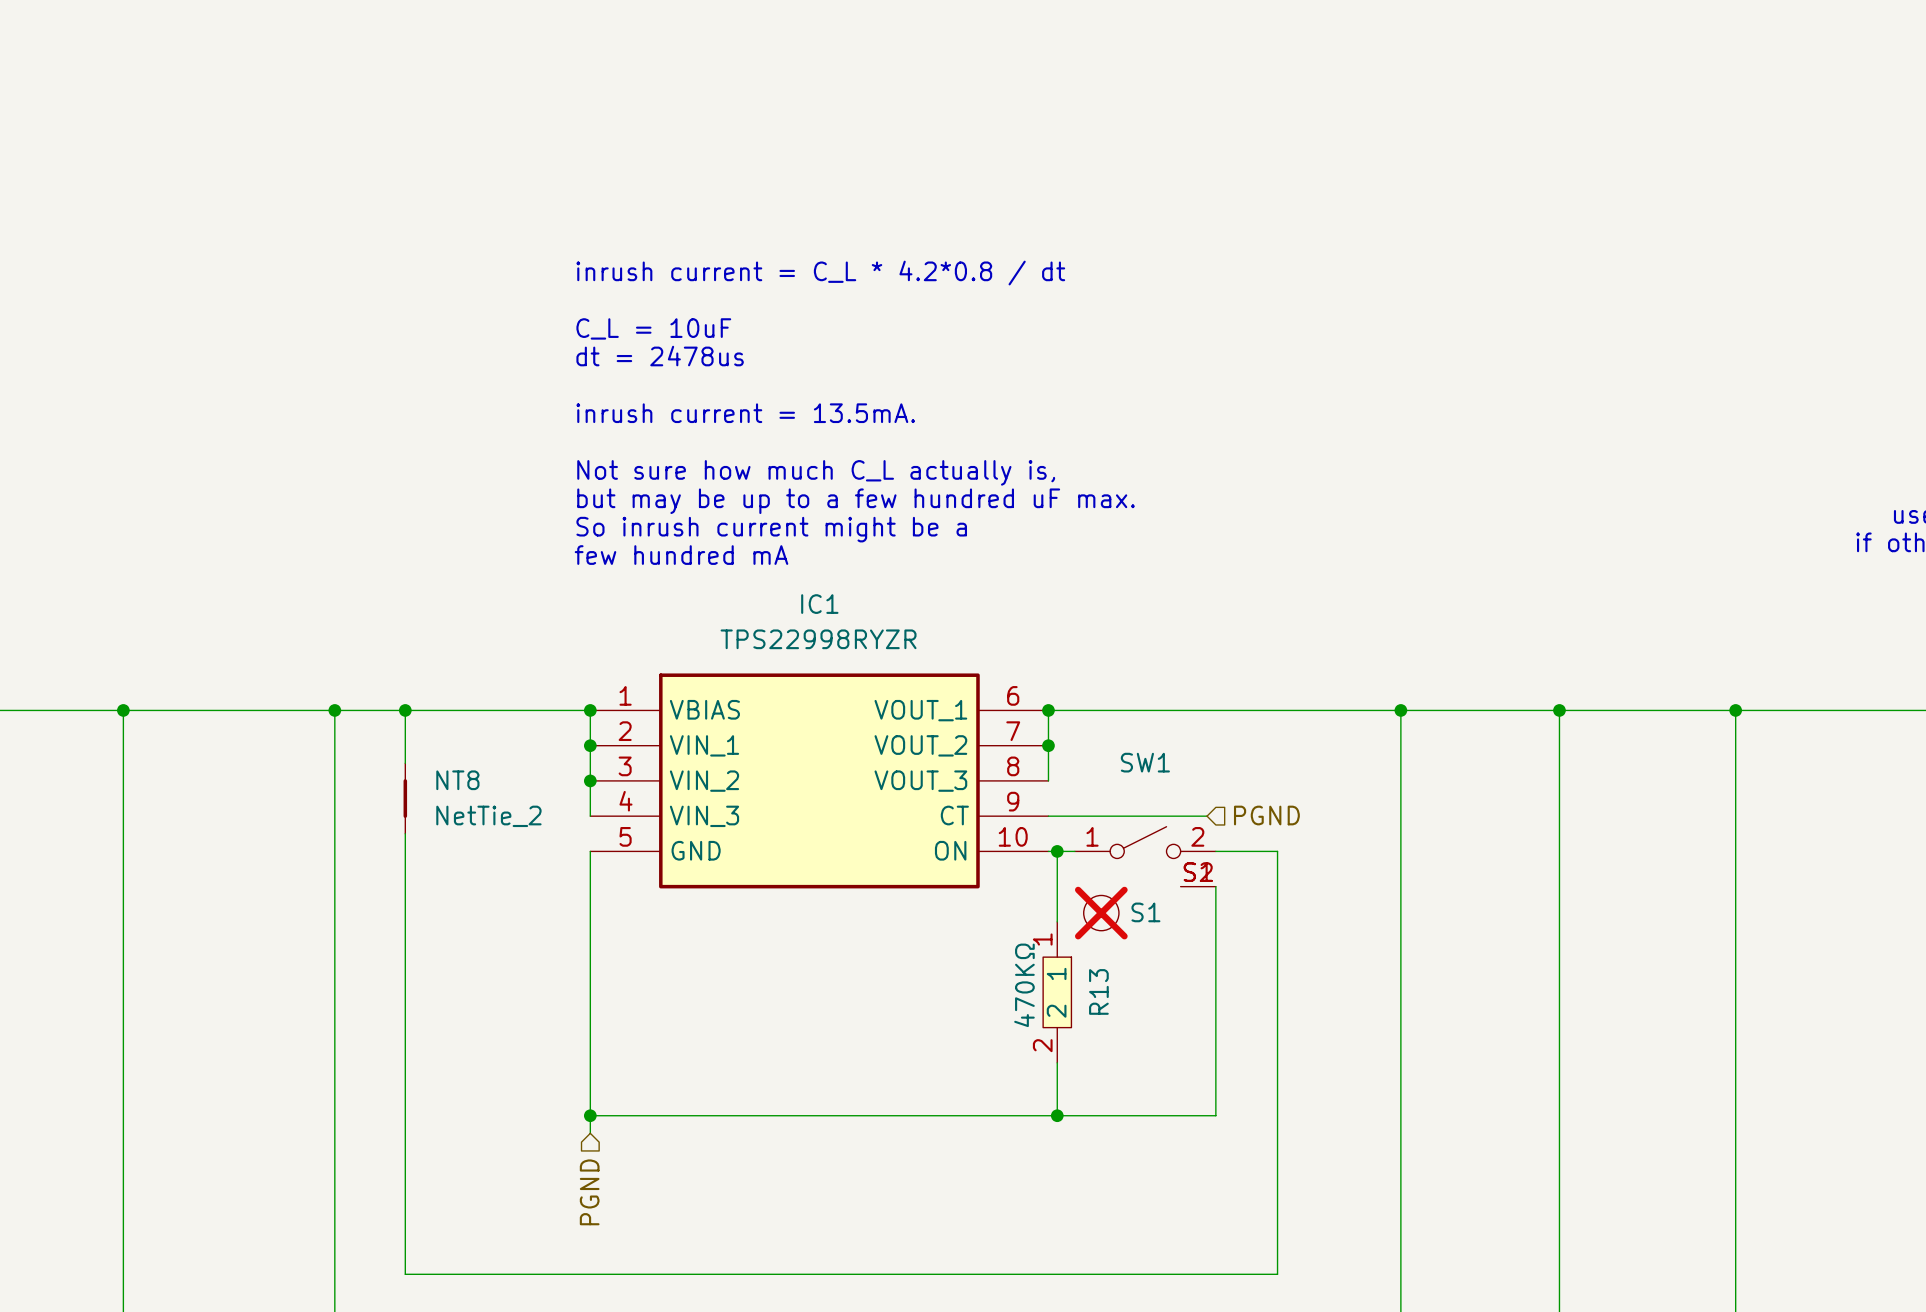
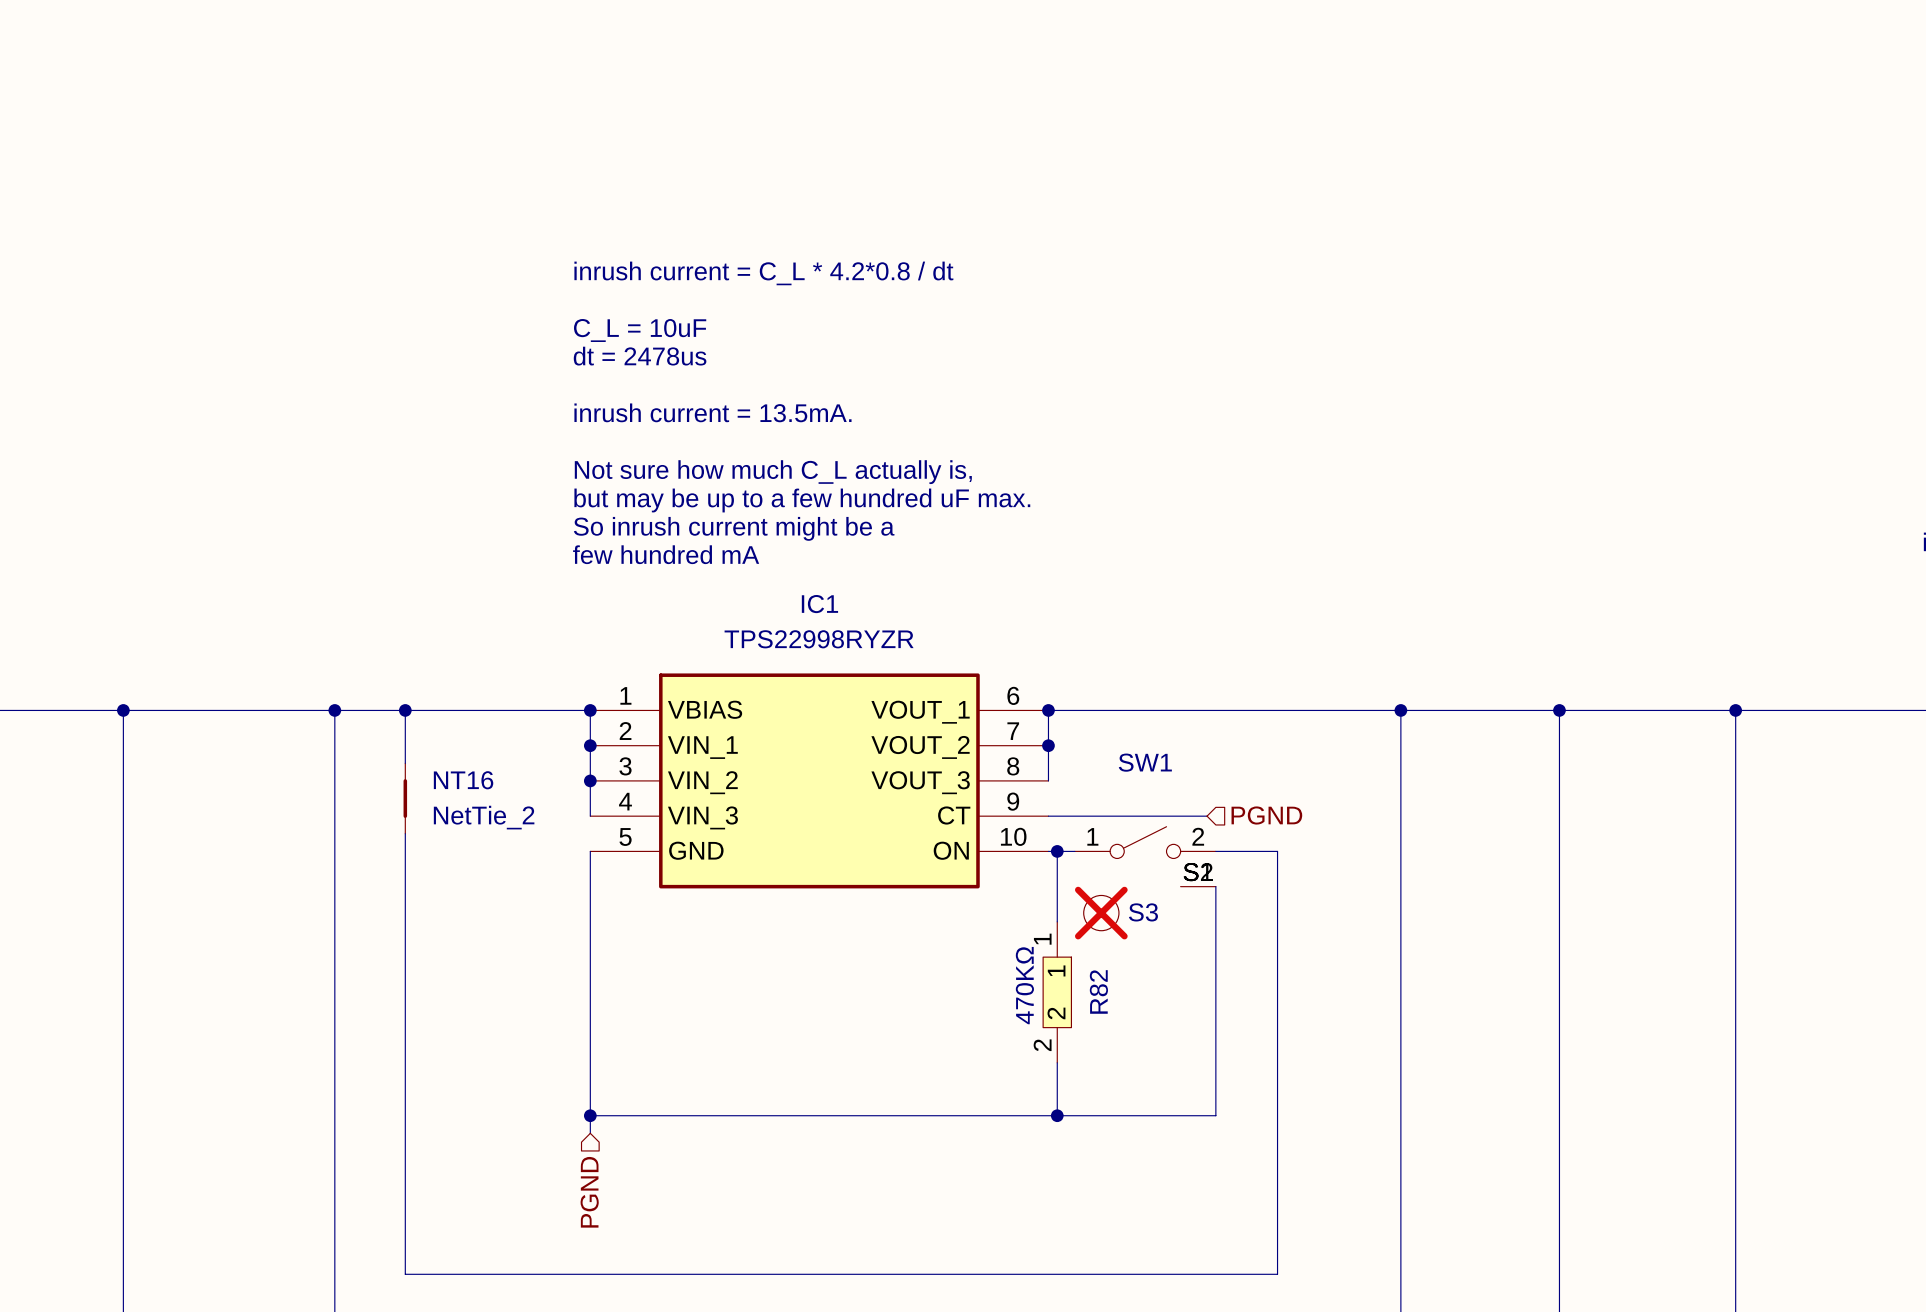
NT8 name: NT8 (457, 780) -> NT16 (463, 780)
S1 name: S1 (1145, 912) -> S3 (1143, 912)
R13 name: R13 (1098, 991) -> R82 (1098, 991)

